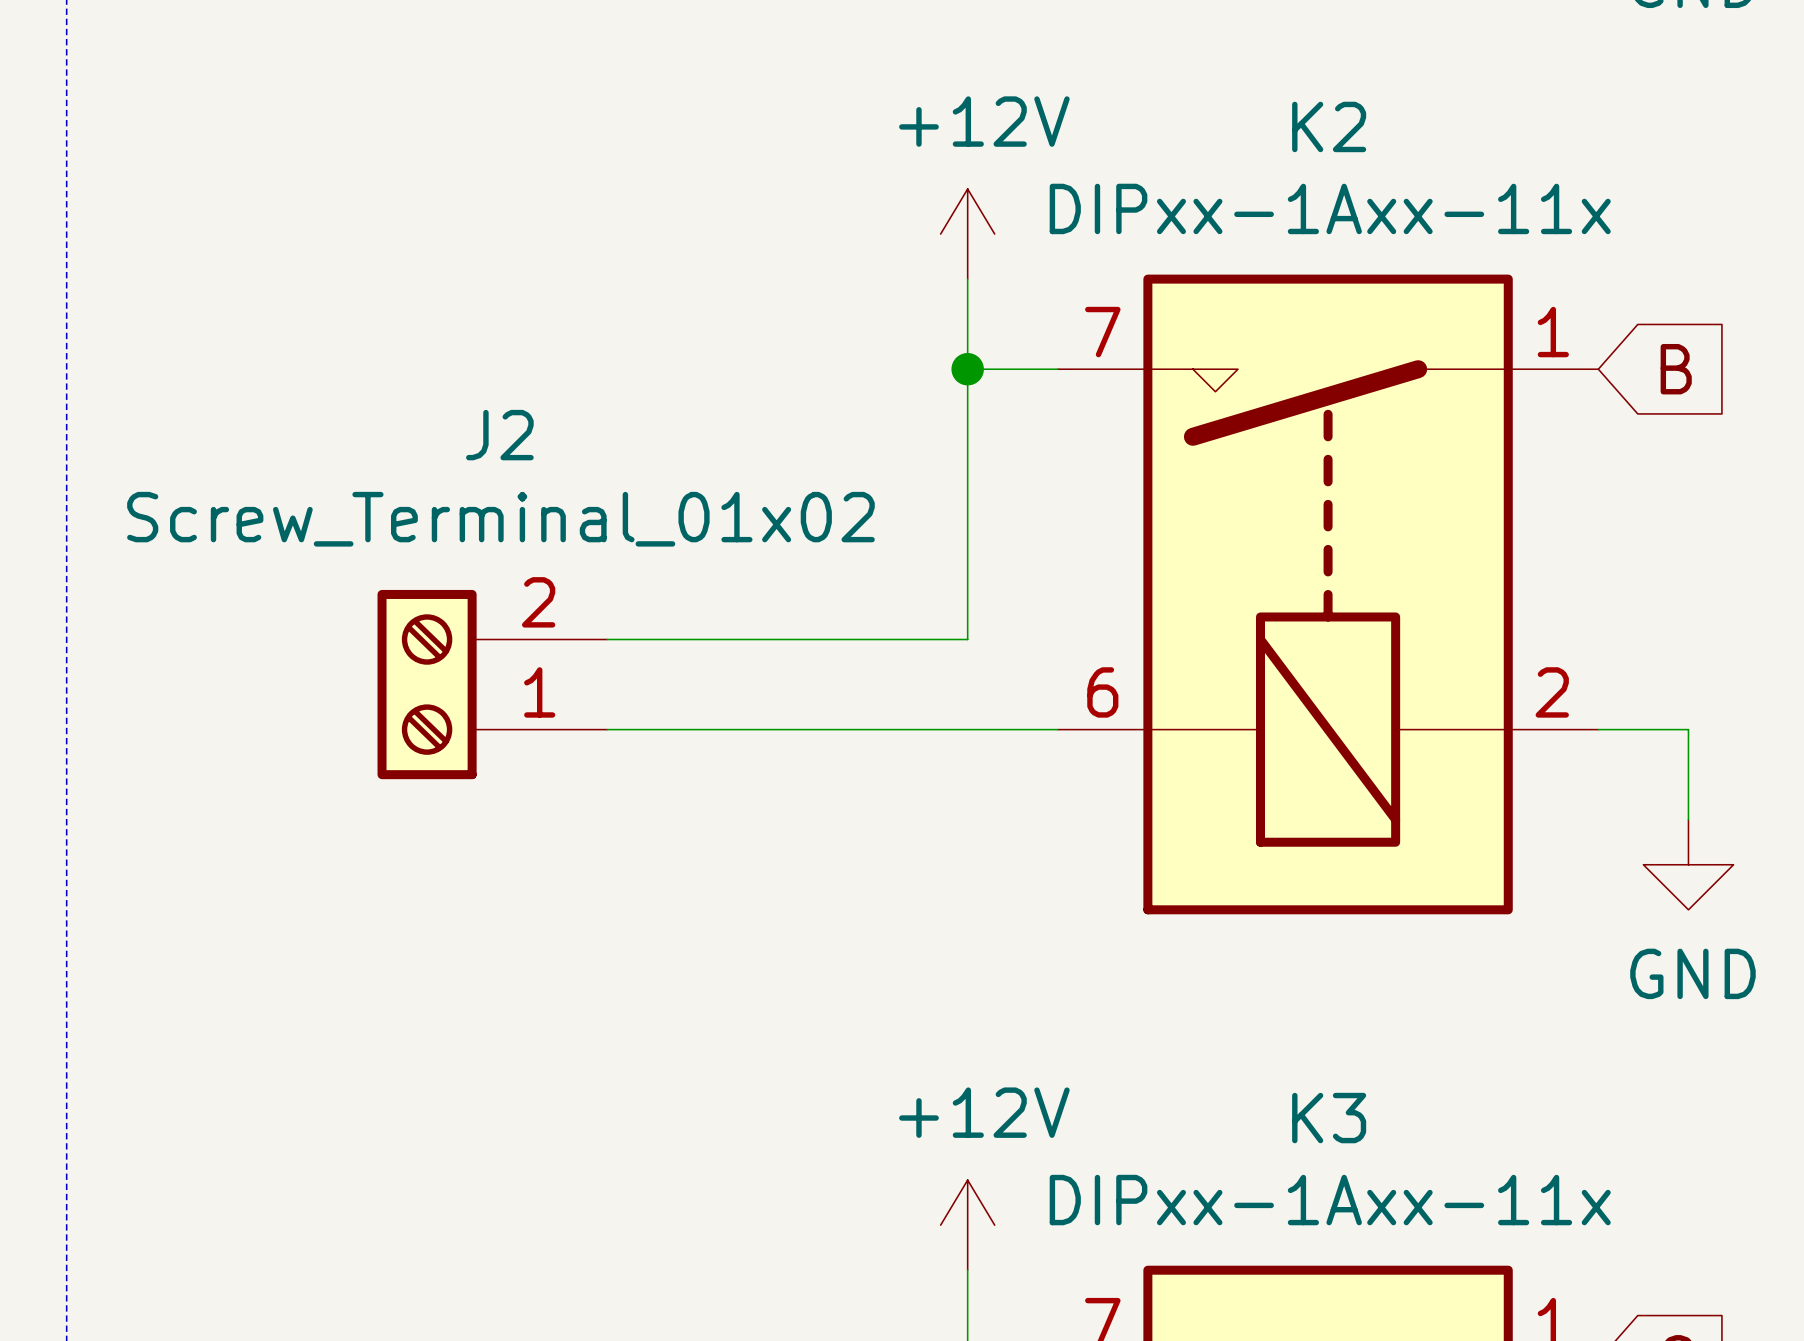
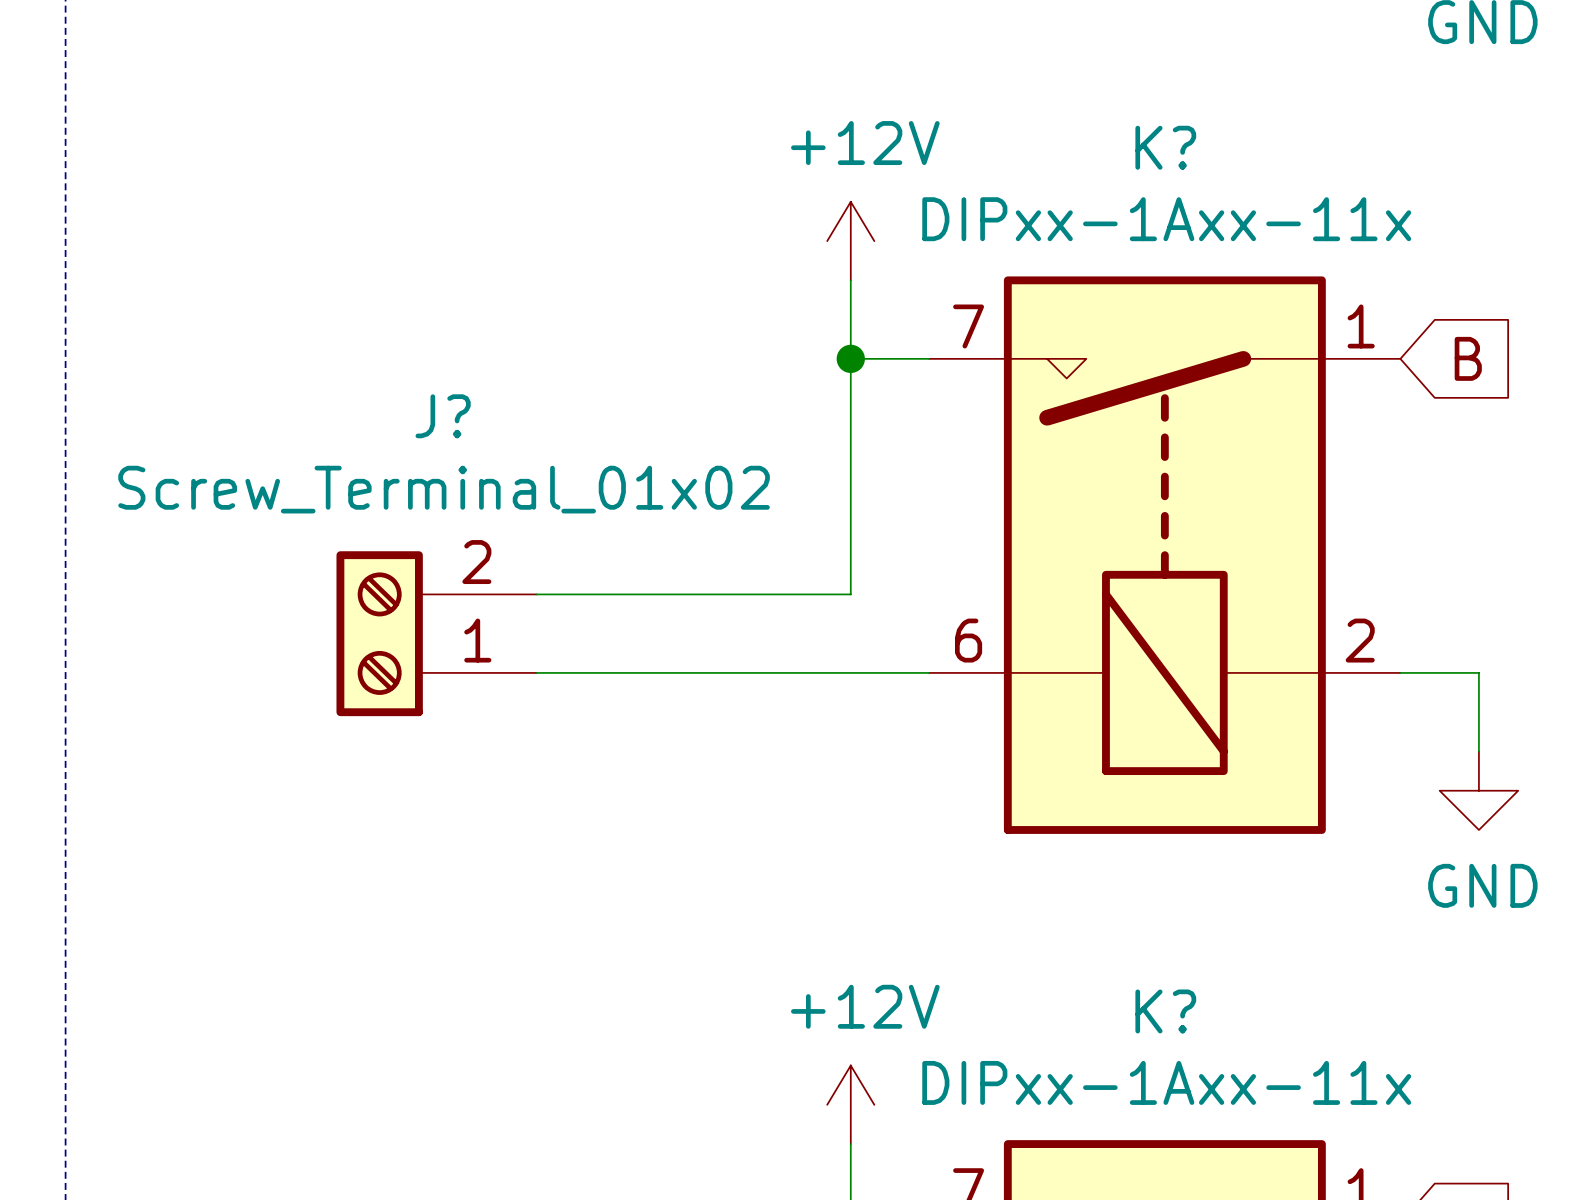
K2 name: K2 (1329, 126) -> K? (1165, 147)
J2 name: J2 (499, 435) -> J? (443, 416)
K3 name: K3 (1329, 1118) -> K? (1165, 1011)

